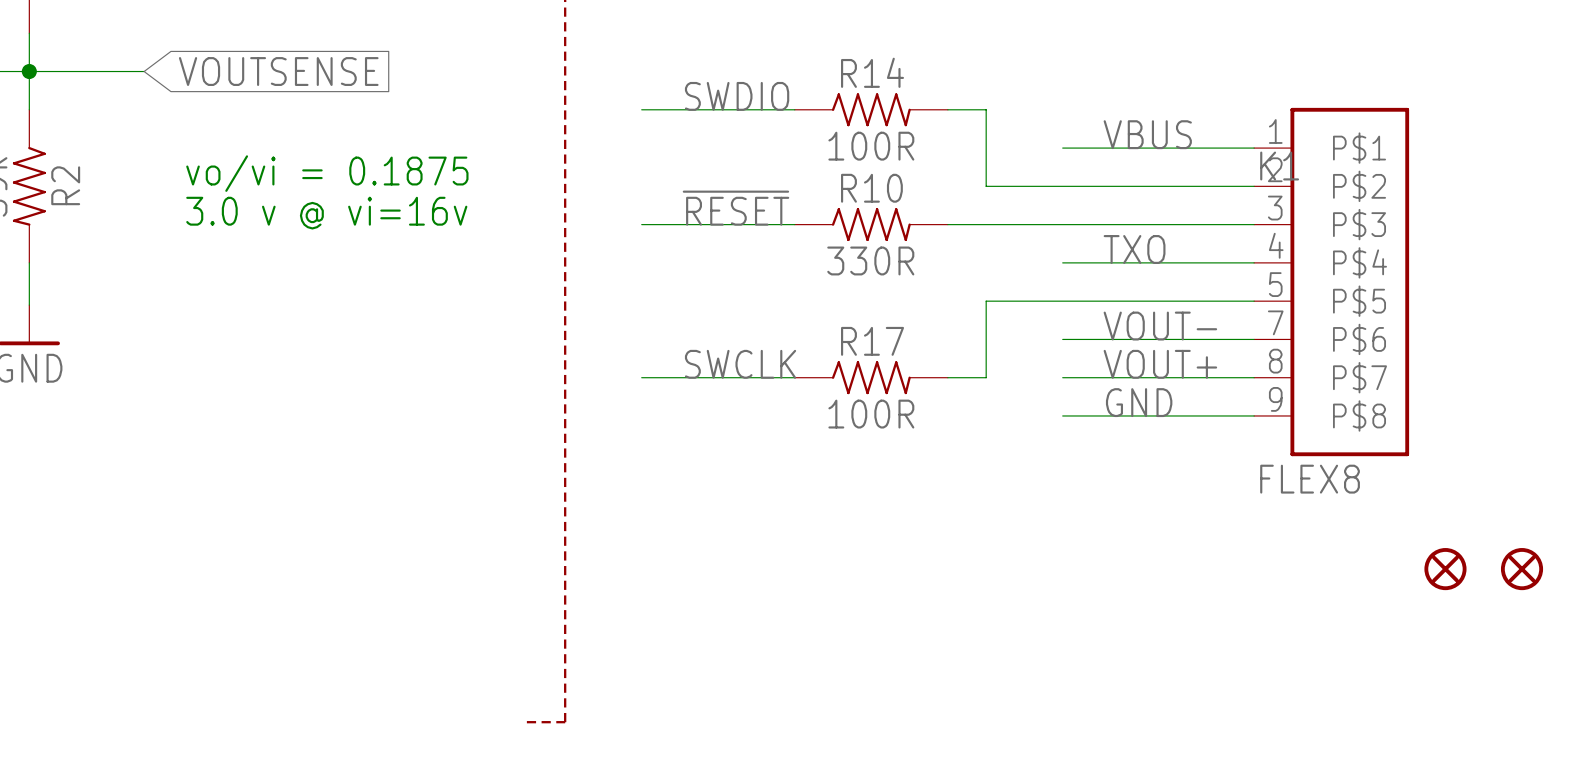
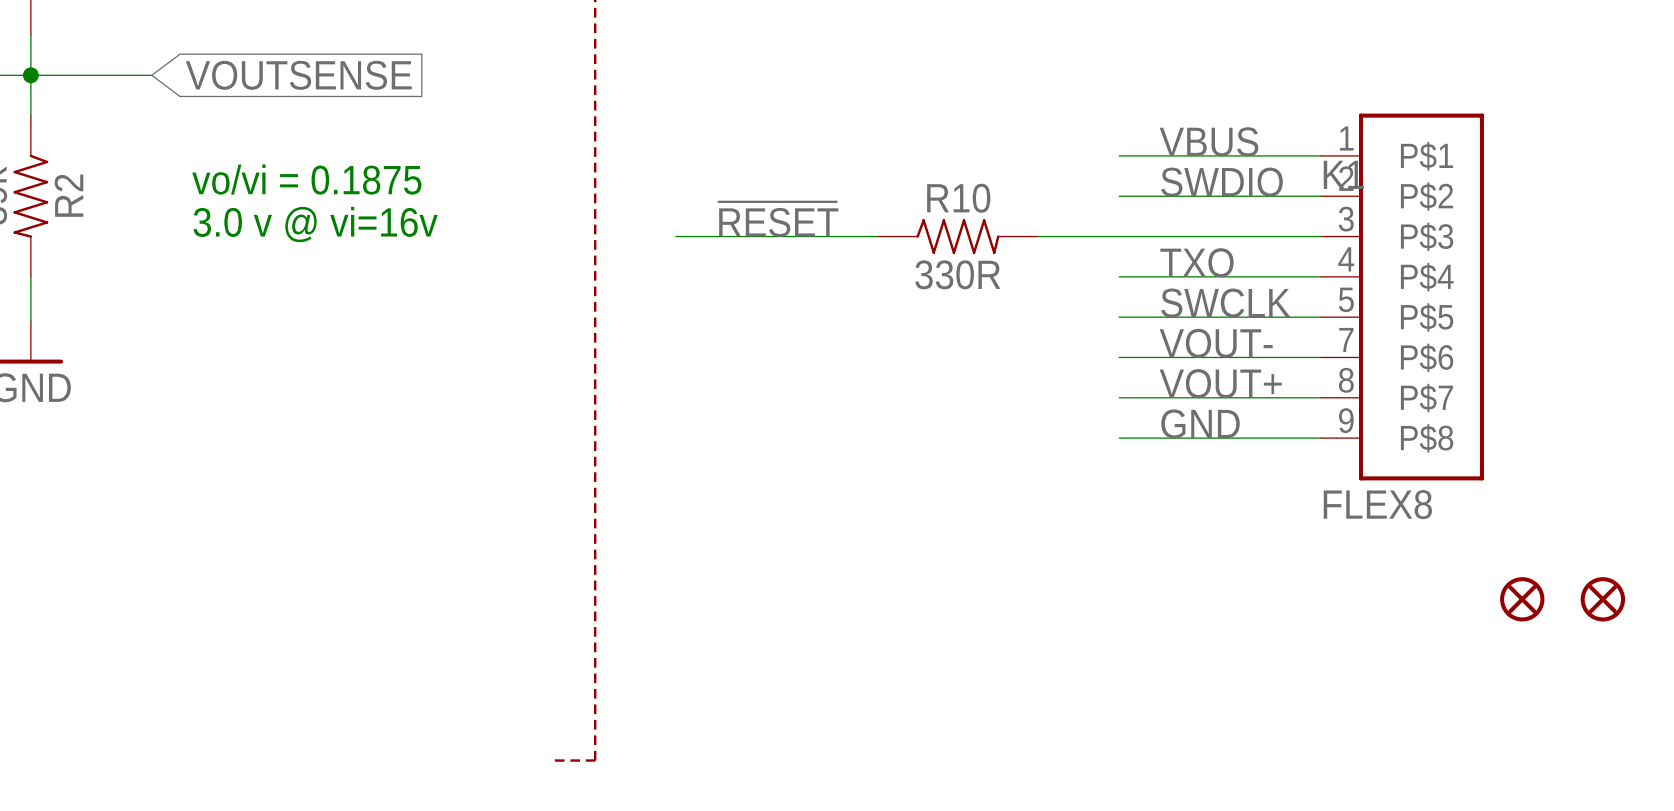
label: SWDIO (737, 96) -> none
wire: (641, 109) (794, 109) -> none
R14: 100R (871, 109) -> none
wire: (947, 109) (986, 109) (986, 186) (1062, 186) -> none
label: none -> SWDIO (1221, 182)
R10 position: (871, 224) -> (957, 236)
label: none -> SWCLK (1225, 303)
wire: (1062, 301) (986, 301) (986, 377) (947, 377) -> none
label: SWCLK (740, 364) -> none
wire: (641, 377) (794, 377) -> none
R17: 100R (871, 377) -> none

